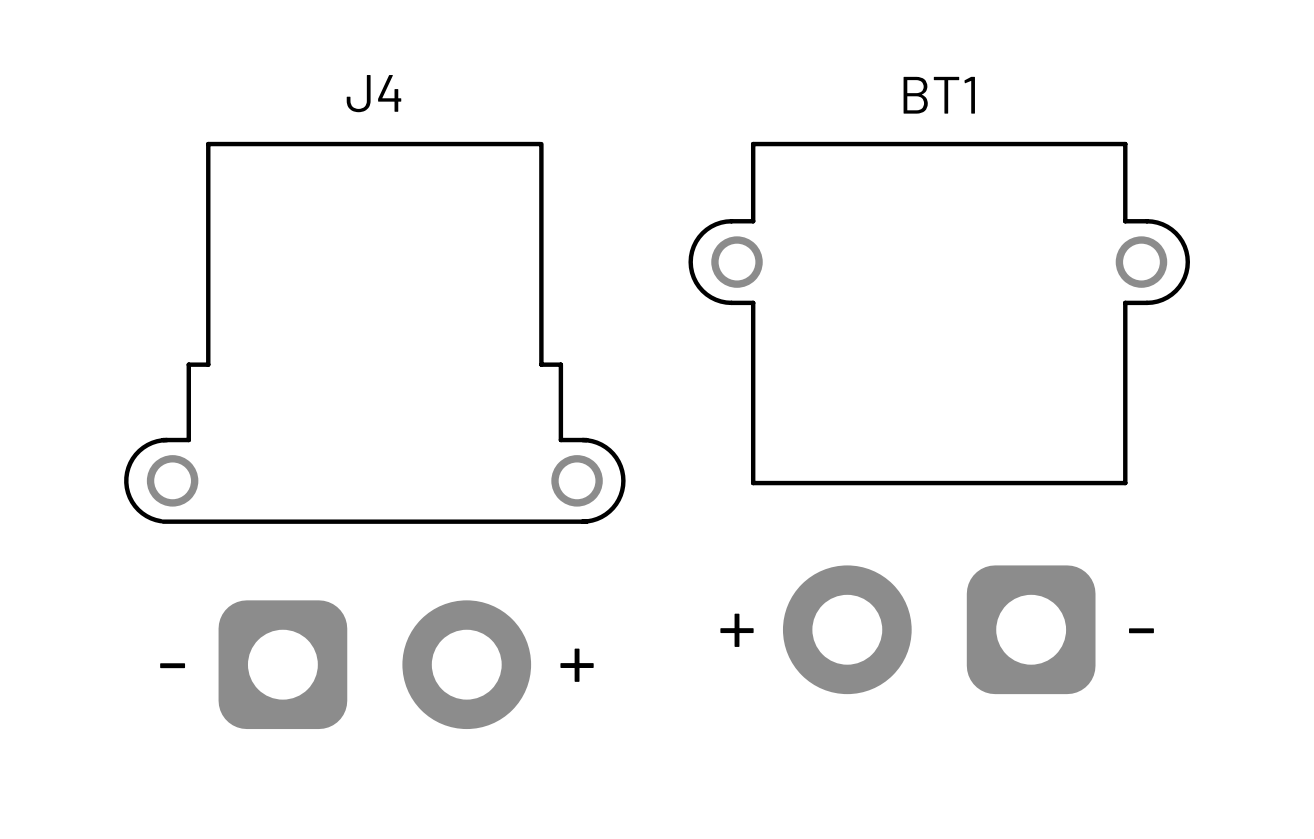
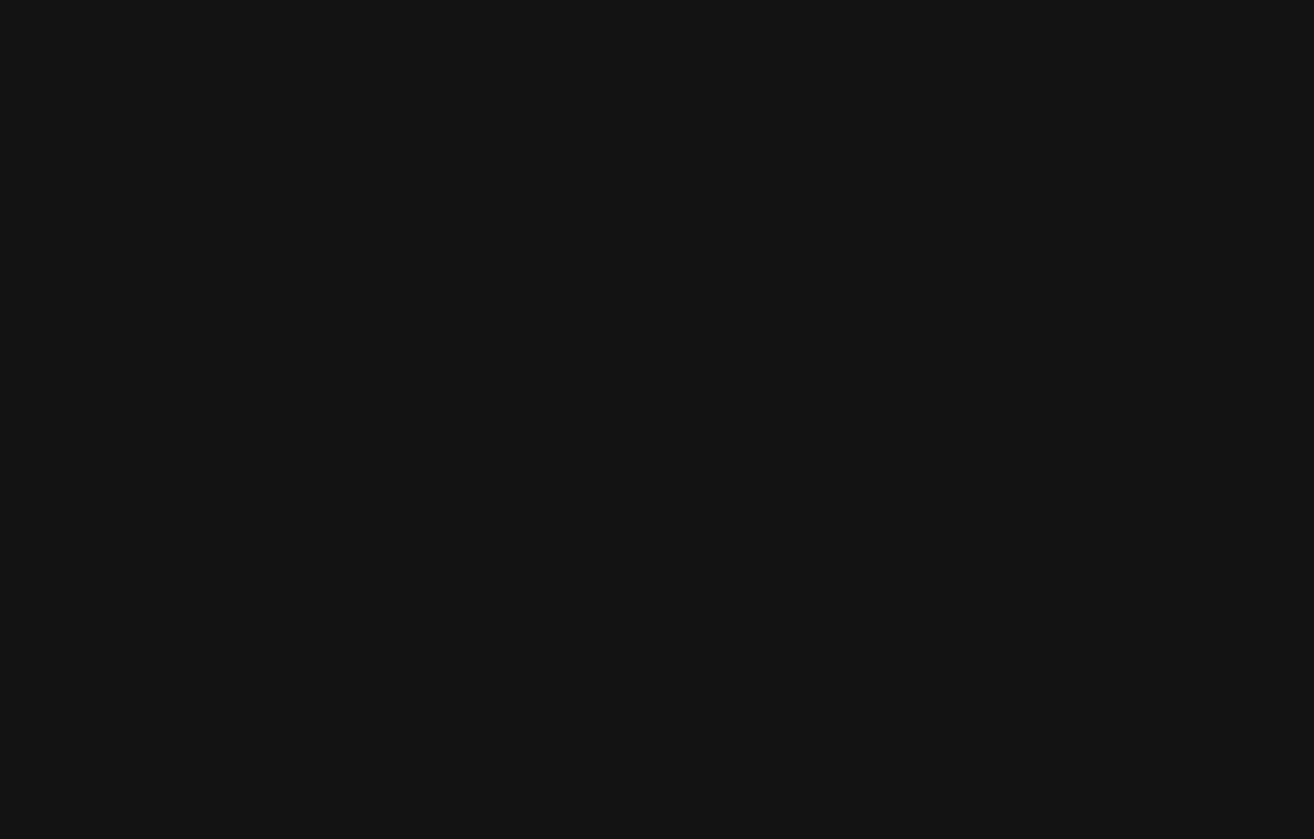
BT1: (939, 417) -> none
J4: (374, 435) -> none

